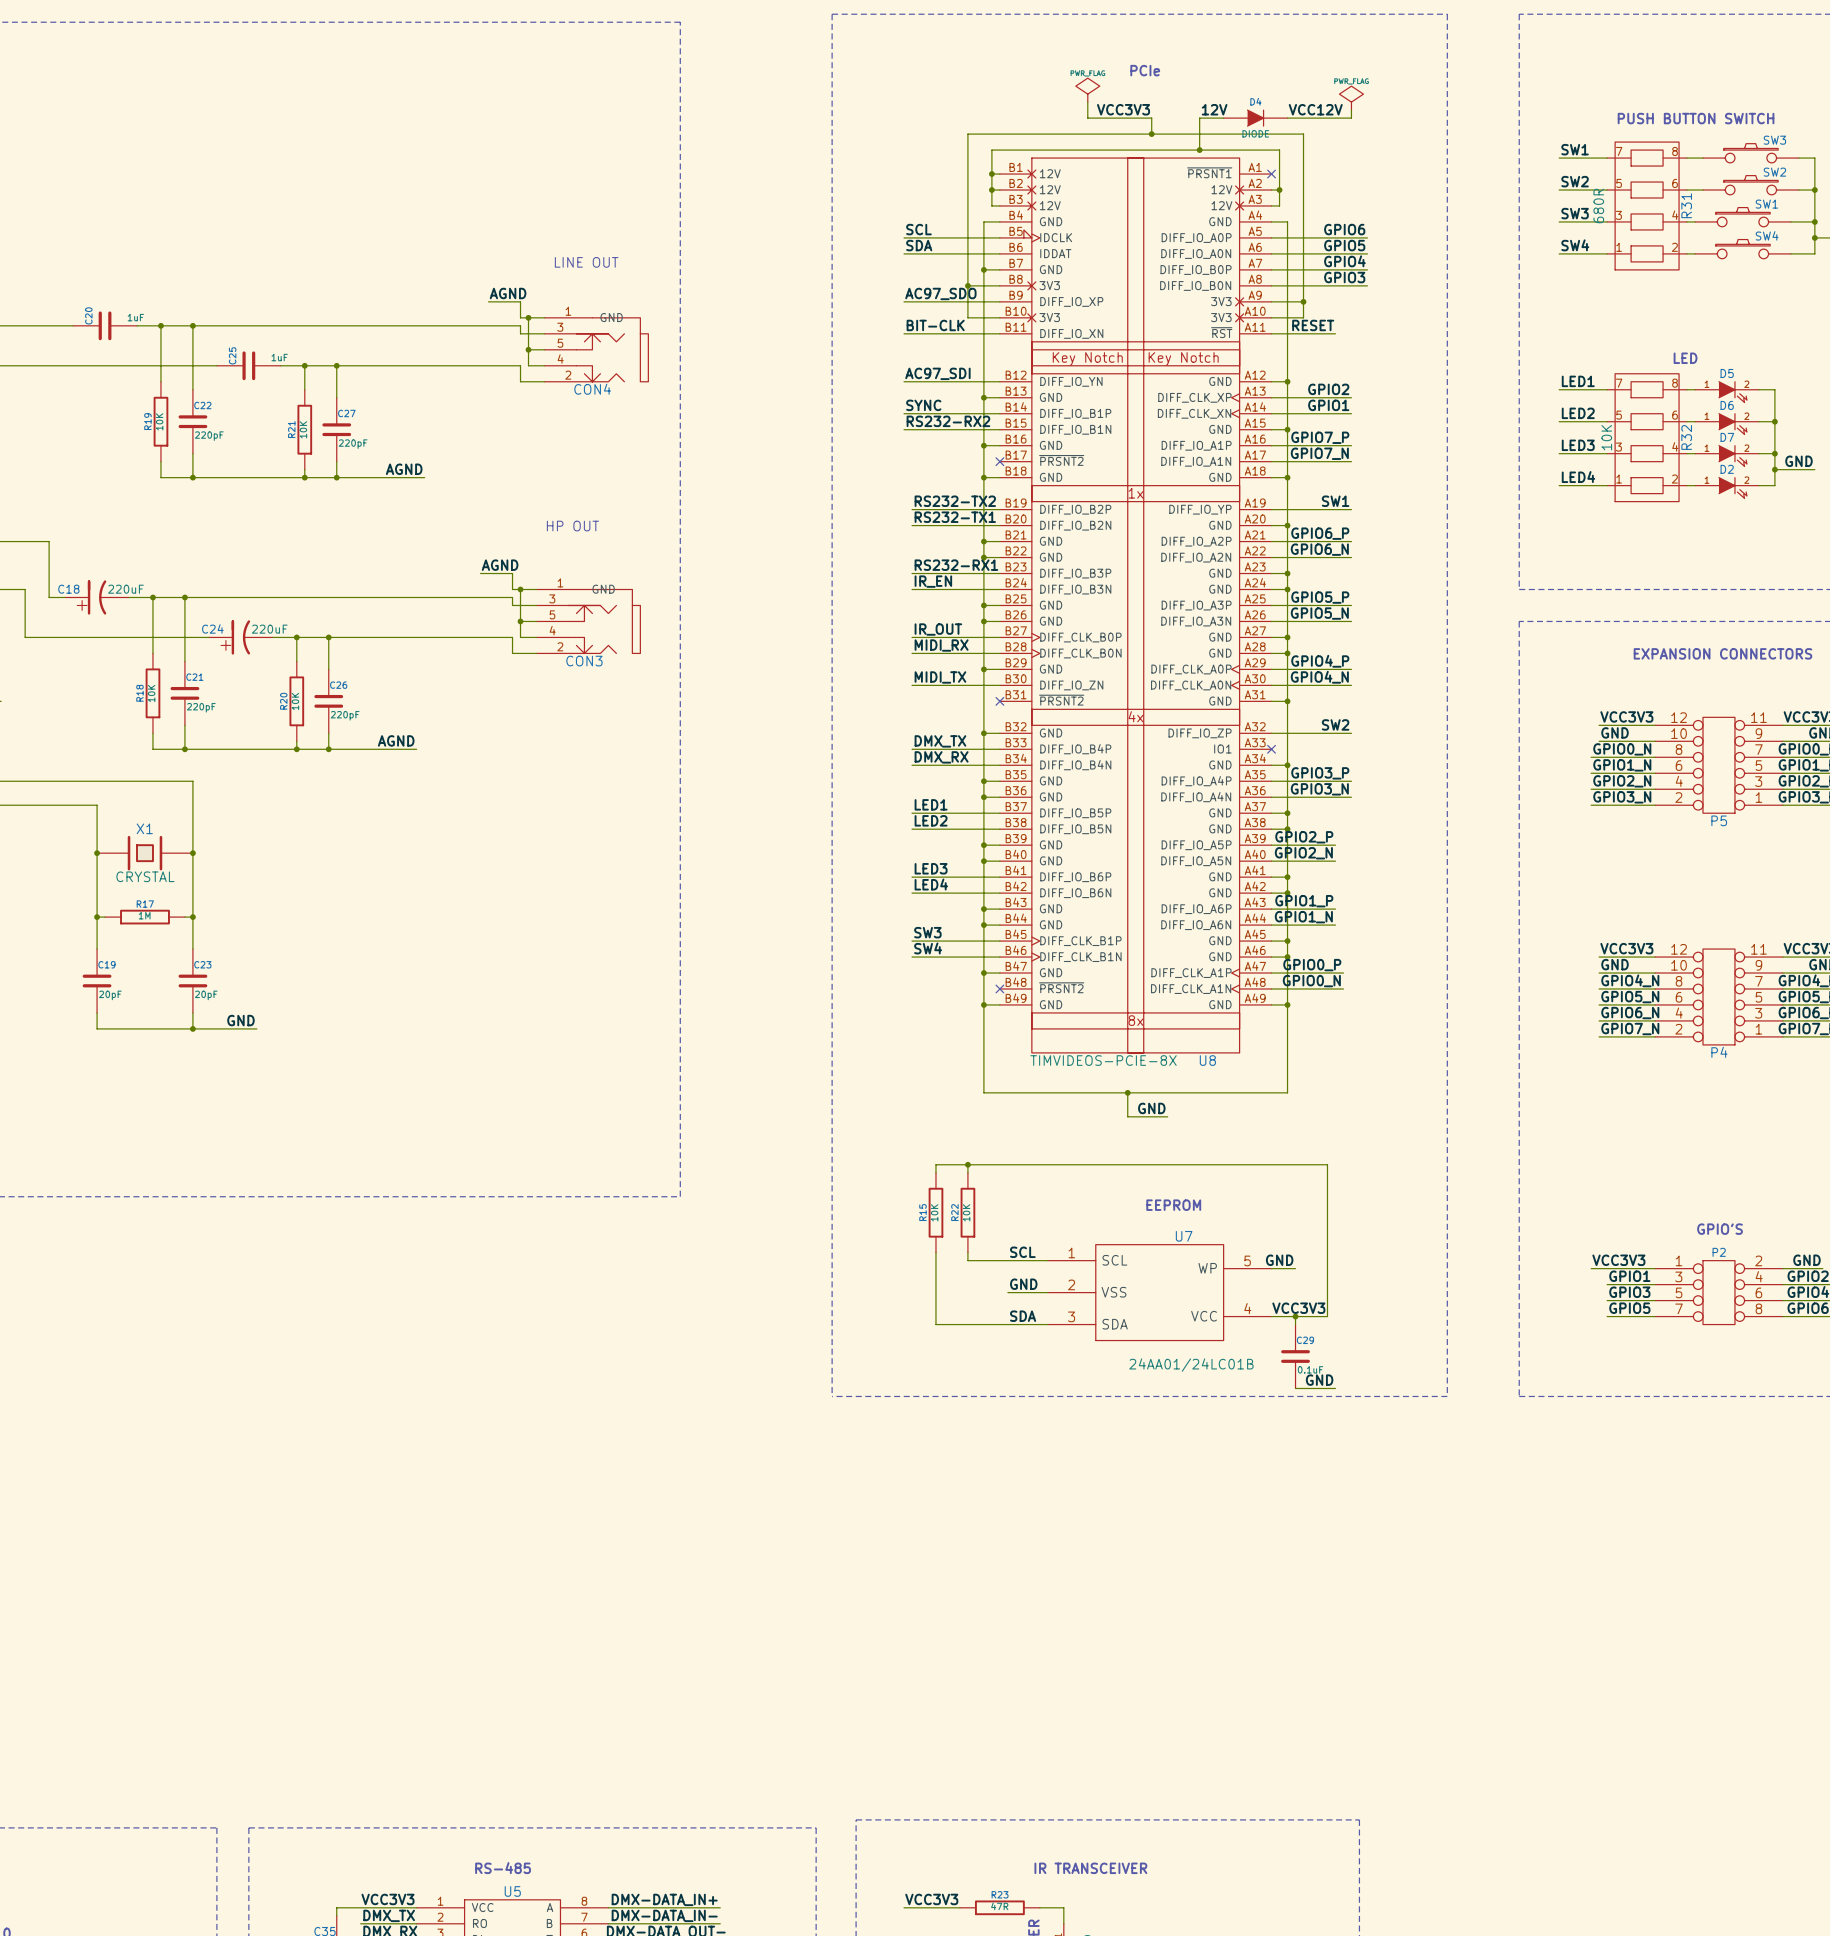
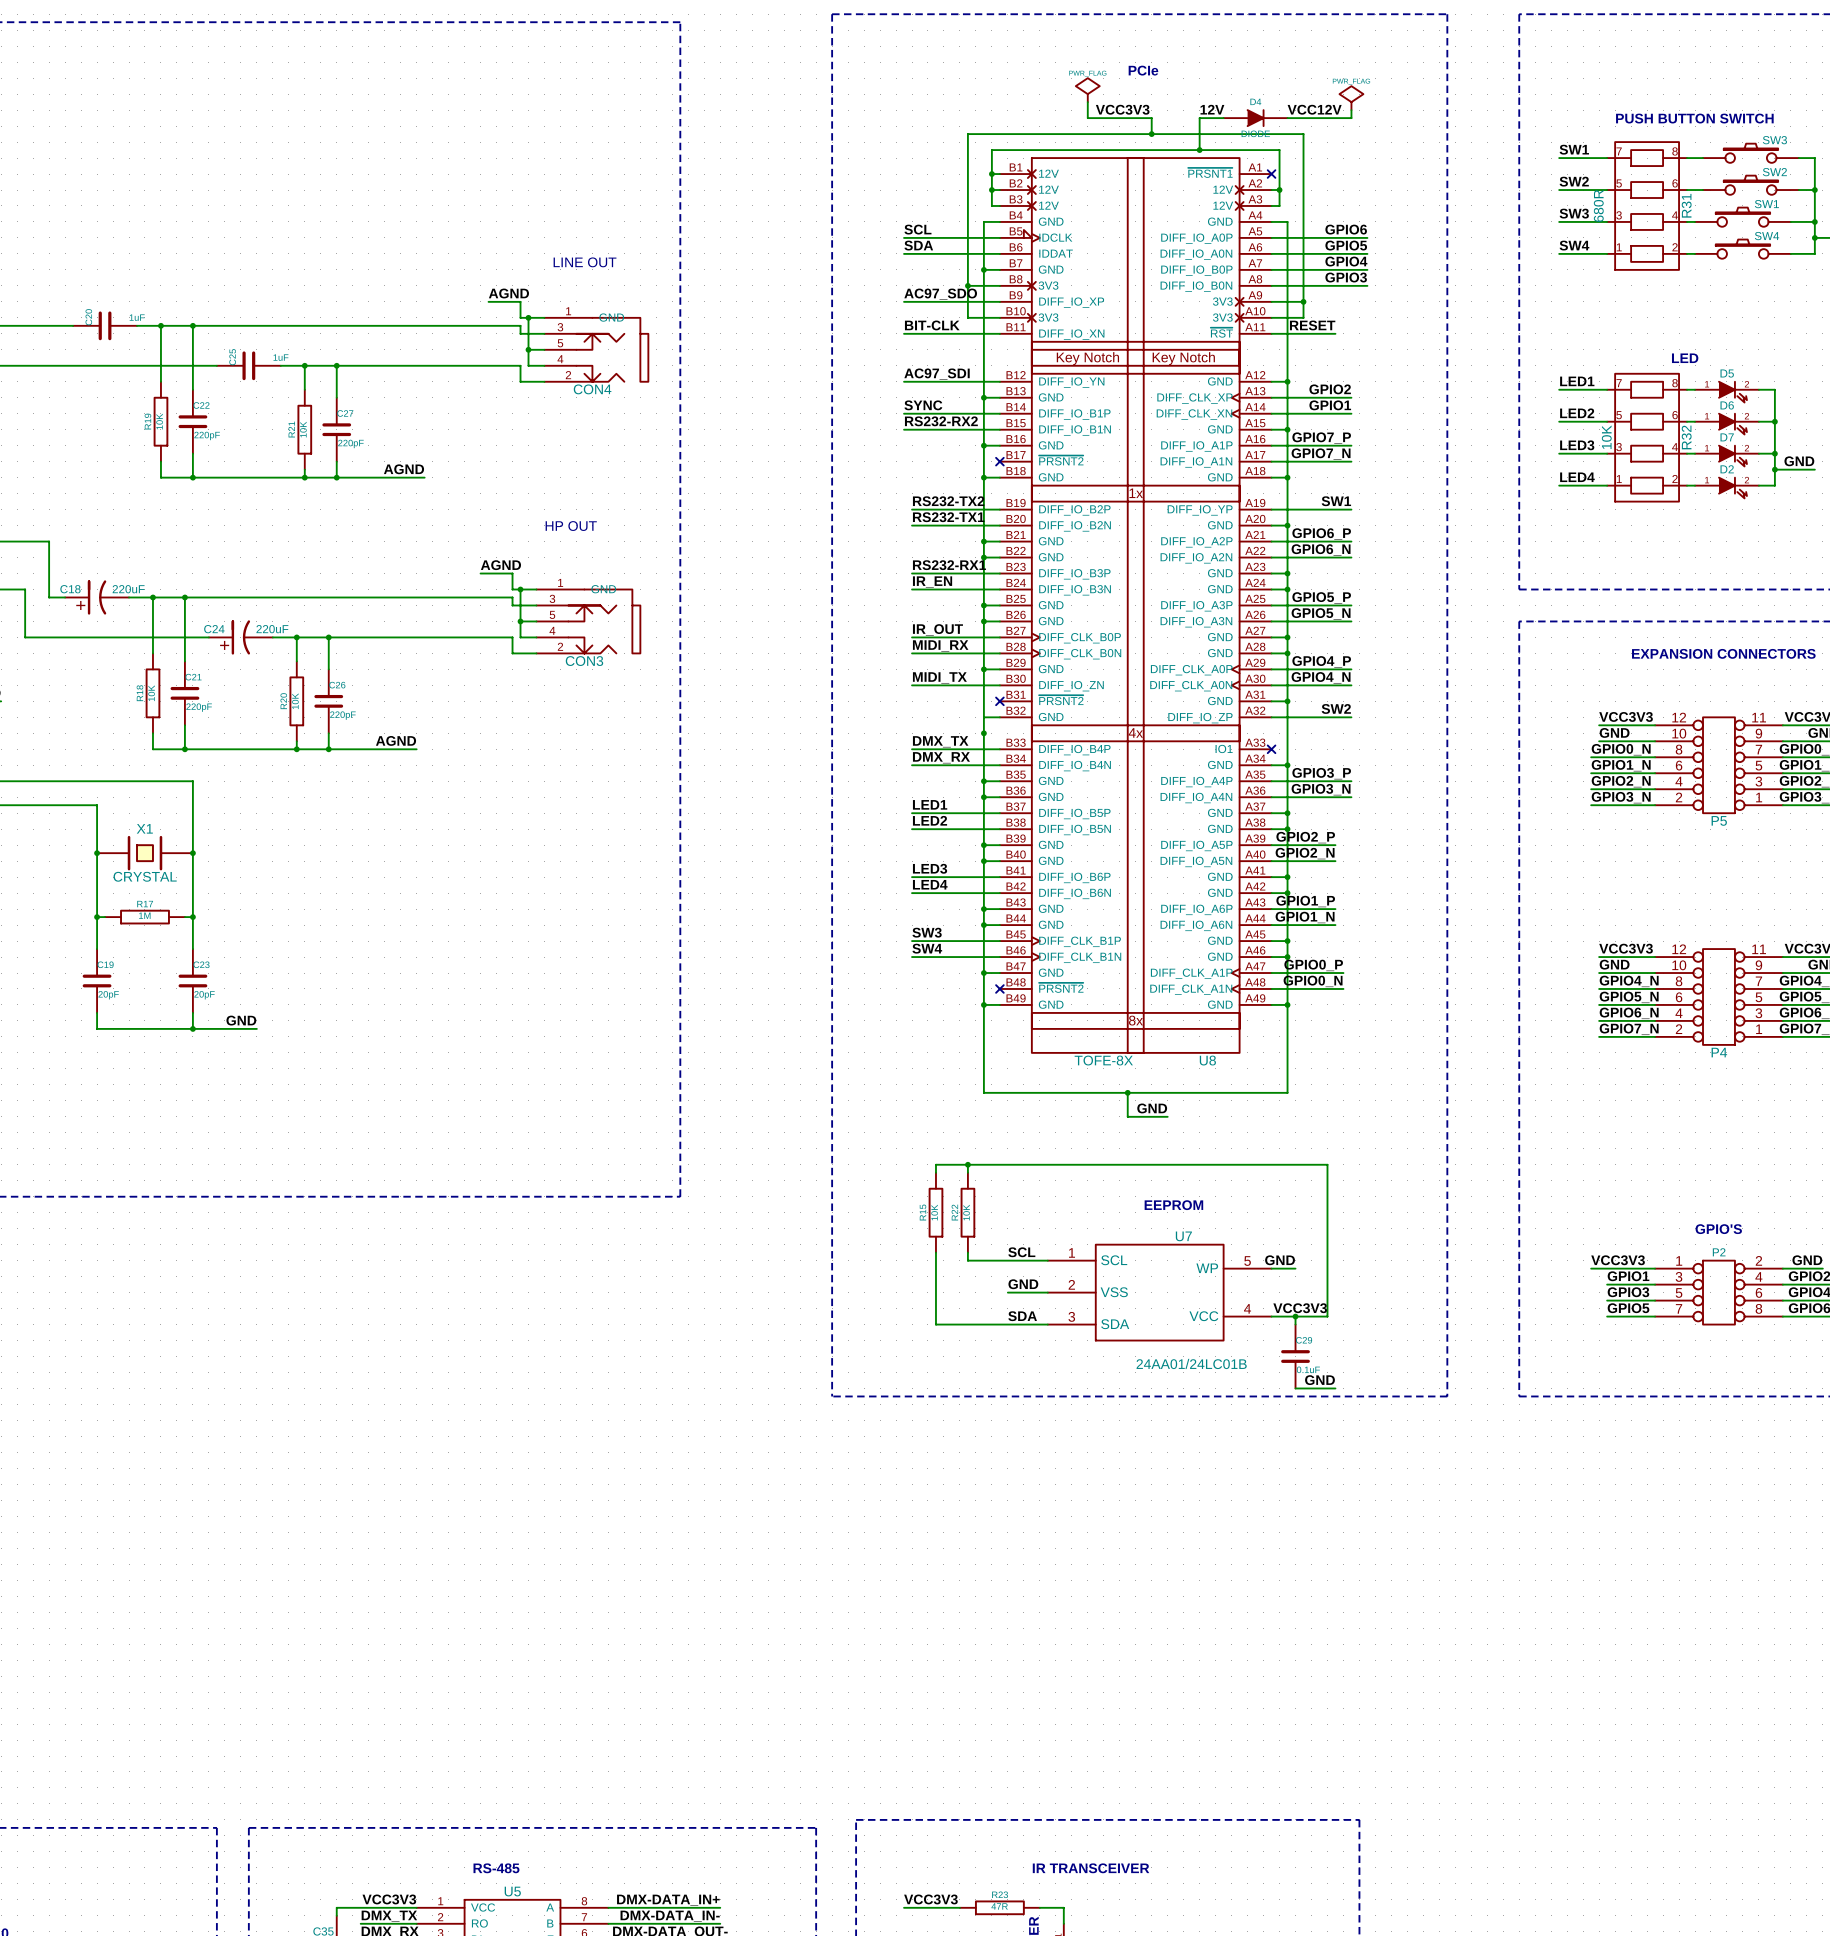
U8 symbol: [999, 158, 1272, 1053] -> [999, 158, 1272, 1053]
label position: SW2 (1335, 724) -> SW2 (1336, 708)
wire: (983, 733) (999, 733) -> (983, 717) (999, 717)
wire: (1271, 733) (1351, 733) -> (1271, 717) (1351, 717)
U8 value: TIMVIDEOS-PCIE-8X (1103, 1060) -> TOFE-8X (1103, 1060)

